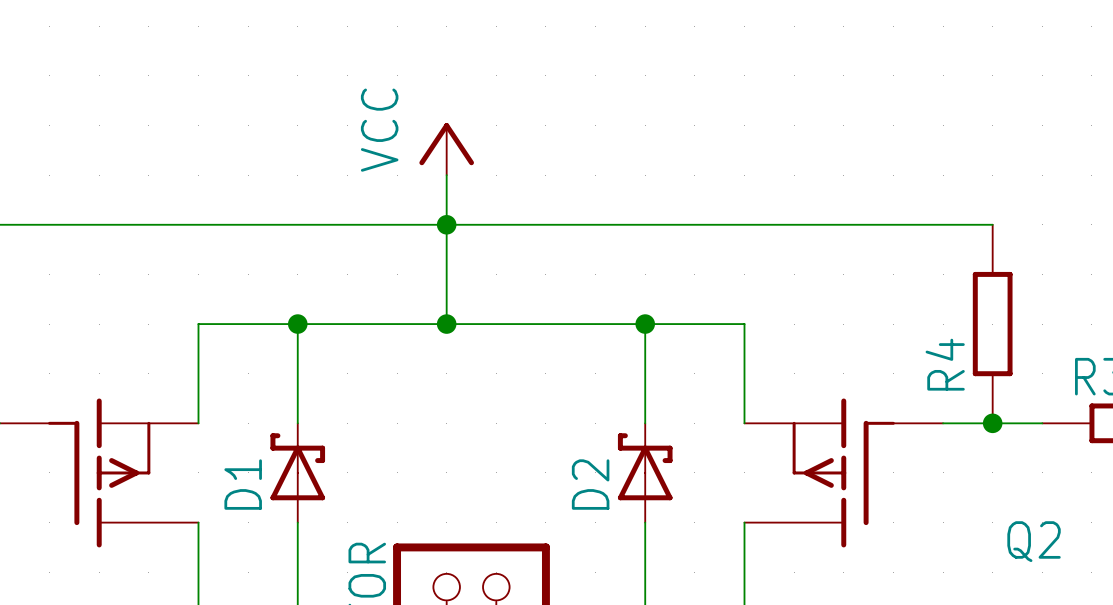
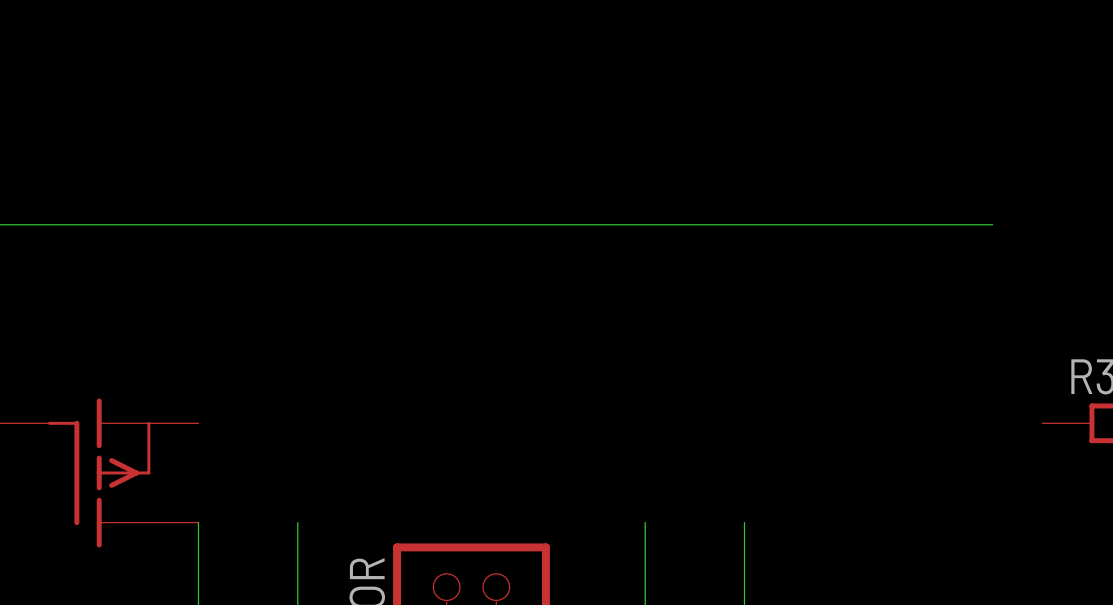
power symbol: VCC (446, 149) -> none
wire: (446, 175) (446, 324) -> none
junction: (446, 224) -> none
wire: (297, 324) (297, 423) -> none
junction: (297, 324) -> none
junction: (446, 324) -> none
wire: (645, 324) (645, 423) -> none
junction: (645, 324) -> none
R4: (992, 324) -> none
wire: (198, 423) (198, 324) (744, 324) (744, 423) -> none
wire: (943, 423) (1042, 423) -> none
junction: (992, 423) -> none
D1: (297, 472) -> none
D2: (645, 472) -> none
Q2: (843, 472) -> none

